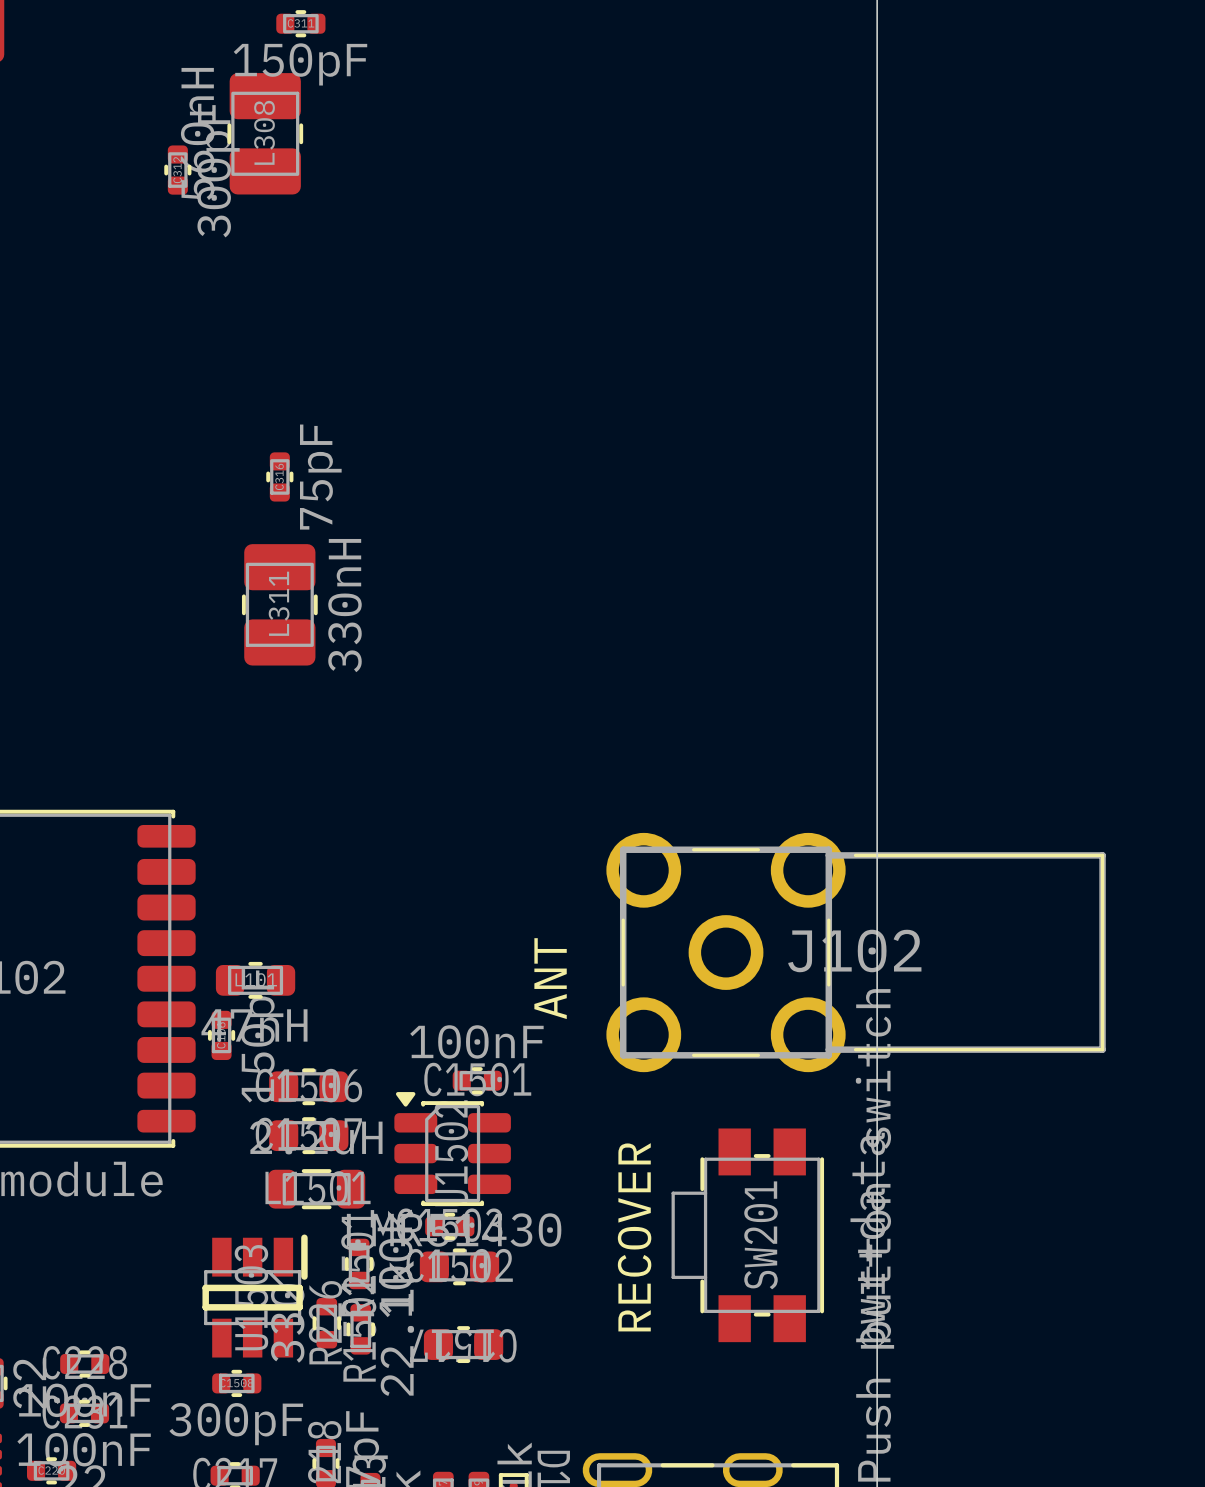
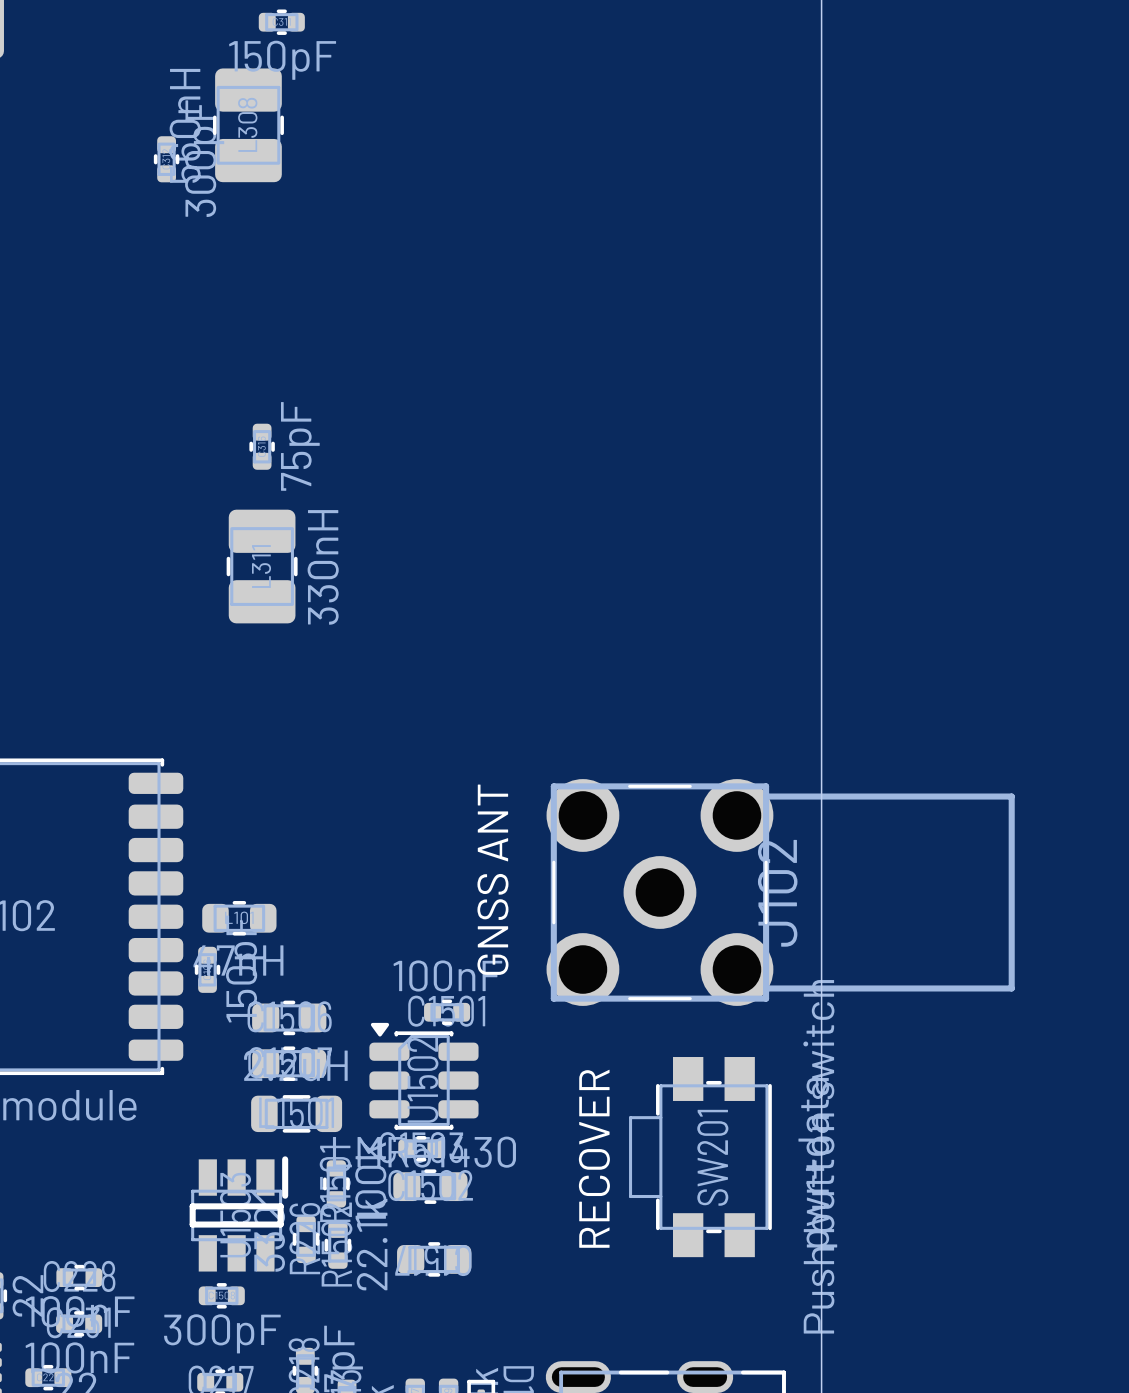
J102 footprint: [606, 832, 1106, 1073] -> [546, 779, 1015, 1006]
J102 text: ANT (550, 978) -> GNSS ANT (492, 879)

